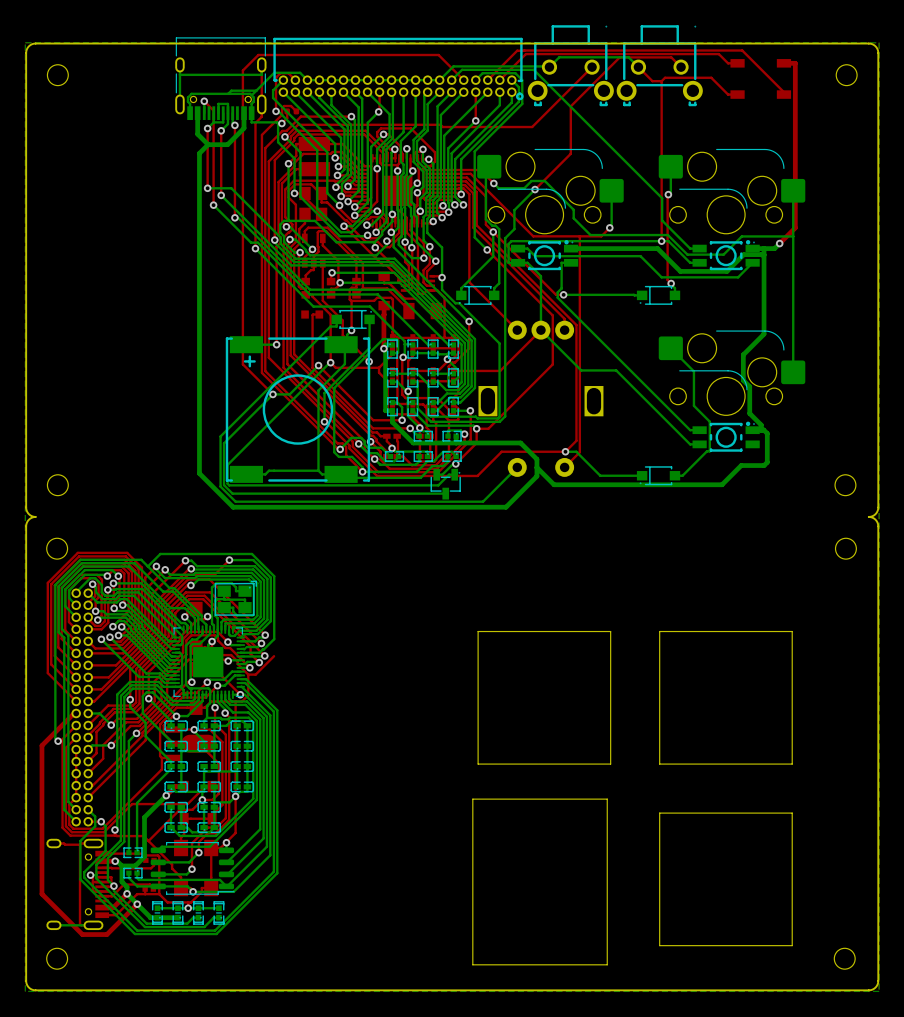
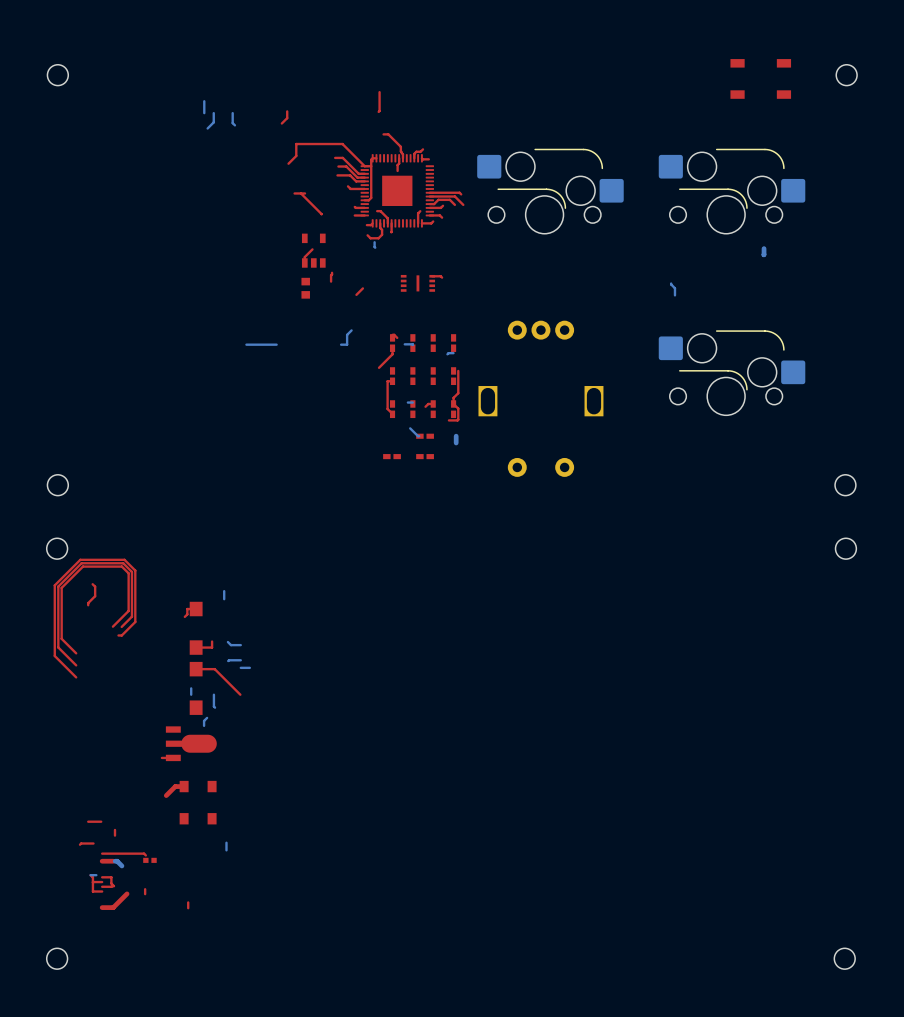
bottom zone outline: (879, 42) (879, 991) (25, 991) (25, 42) (879, 42) -> none
board edge: (868, 43) (35, 43) (28, 46) (26, 53) (26, 507) (28, 514) (35, 516) (28, 519) (26, 526) (26, 980) (28, 987) (35, 990) (868, 990) (876, 986) (878, 980) (878, 526) (875, 519) (868, 516) (875, 514) (878, 507) (878, 53) (875, 46) (868, 43) -> none
top track: (737, 63) (728, 63) (718, 54) (525, 54) (499, 80) -> none
top track: (783, 63) (795, 63) (795, 227) (779, 243) -> none
bottom track: (179, 64) (179, 104) -> none
top track: (261, 64) (261, 116) (255, 123) (255, 248) -> none
bottom track: (261, 64) (261, 74) (179, 74) -> none
part: (570, 65) -> none
part: (659, 65) -> none
top track: (592, 67) (532, 127) (298, 124) (284, 136) -> none
top track: (638, 67) (652, 81) (661, 81) -> none
bottom track: (638, 67) (628, 57) (559, 57) (549, 67) (453, 66) (439, 80) (307, 80) (300, 72) (274, 72) (252, 94) -> none
top track: (681, 67) (671, 57) (619, 57) (570, 106) (570, 153) (535, 189) -> none
part: (398, 69) -> none
part: (220, 78) -> none
bottom track: (283, 80) (273, 90) (273, 98) (327, 152) (327, 193) (339, 205) -> none
top track: (295, 80) (288, 73) (280, 73) (276, 77) (276, 111) -> none
bottom track: (451, 80) (462, 69) (533, 69) (662, 198) (662, 220) (690, 248) (699, 248) -> none
top track: (463, 80) (438, 55) (258, 55) (242, 70) (242, 364) (272, 394) -> none
bottom track: (475, 80) (482, 73) (515, 73) (522, 80) (522, 103) (474, 151) (474, 237) (487, 249) -> none
top track: (487, 80) (517, 50) (742, 50) (783, 92) (783, 94) -> none
bottom track: (511, 80) (518, 87) (518, 101) (461, 159) (461, 194) -> none
top track: (661, 81) (661, 241) -> none
top track: (661, 81) (665, 77) (711, 77) (728, 94) (737, 94) -> none
bottom track: (256, 90) (231, 90) (228, 93) -> none
bottom track: (283, 92) (335, 143) (335, 157) -> none
bottom track: (295, 92) (341, 137) (341, 163) (338, 166) -> none
bottom track: (307, 92) (344, 129) (344, 169) (337, 175) -> none
bottom track: (319, 92) (319, 97) (347, 126) (347, 173) (335, 187) -> none
bottom track: (331, 92) (331, 105) (351, 124) (351, 174) (341, 184) (341, 196) -> none
bottom track: (343, 92) (358, 107) (358, 191) (348, 201) -> none
bottom track: (355, 92) (362, 98) (362, 199) (354, 206) -> none
bottom track: (367, 92) (389, 114) (389, 136) (377, 149) (377, 168) -> none
bottom track: (391, 92) (392, 138) (383, 147) (383, 213) (371, 225) (366, 225) -> none
bottom track: (403, 92) (403, 132) (386, 149) (386, 222) (376, 232) -> none
bottom track: (415, 92) (415, 126) (400, 141) (400, 161) (403, 164) (403, 173) (401, 175) (401, 236) (398, 239) (398, 244) (412, 258) (423, 258) -> none
bottom track: (427, 92) (424, 95) (424, 129) (413, 139) (413, 161) (423, 171) (423, 186) (417, 192) -> none
bottom track: (439, 92) (427, 104) (427, 130) (416, 141) (416, 160) (426, 170) (426, 192) (420, 198) (420, 211) -> none
bottom track: (451, 92) (437, 106) (437, 195) (433, 200) (433, 221) -> none
bottom track: (463, 92) (440, 115) (440, 197) (437, 201) (437, 212) (442, 217) -> none
top track: (475, 92) (475, 120) -> none
bottom track: (487, 92) (444, 135) (443, 205) -> none
bottom track: (499, 92) (499, 105) (451, 153) (451, 201) (454, 204) -> none
bottom track: (511, 92) (511, 102) (455, 159) (455, 196) (463, 204) -> none
top track: (204, 101) (213, 110) (213, 205) -> none
via: (204, 101) -> none
bottom track: (276, 111) (278, 111) (317, 150) (317, 208) (341, 232) (351, 232) (372, 211) (377, 211) -> none
via: (276, 111) -> none
part: (291, 111) -> none
top track: (296, 111) (291, 106) (284, 106) (282, 108) (282, 114) (261, 134) (261, 372) (340, 449) -> none
bottom track: (378, 111) (367, 122) (367, 202) (354, 215) -> none
via: (378, 111) -> none
bottom track: (190, 113) (187, 97) (191, 93) (250, 93) (253, 97) (251, 103) (251, 122) (278, 123) -> none
bottom track: (197, 113) (197, 134) (208, 144) -> none
bottom track: (218, 113) (218, 103) (227, 103) (227, 124) (221, 130) -> none
bottom track: (223, 113) (223, 122) (213, 122) -> none
bottom track: (244, 113) (244, 128) (227, 144) (208, 144) -> none
top track: (351, 116) (300, 116) (265, 148) (265, 371) (337, 443) (342, 443) (346, 446) (346, 455) (362, 471) -> none
bottom track: (351, 116) (354, 119) (354, 179) (348, 186) -> none
via: (351, 116) -> none
bottom track: (475, 120) (448, 148) (448, 212) -> none
via: (475, 120) -> none
bottom track: (278, 123) (278, 142) (294, 158) (294, 193) -> none
via: (281, 123) -> none
top track: (234, 125) (234, 217) -> none
via: (234, 125) -> none
top track: (207, 128) (207, 188) -> none
via: (207, 128) -> none
top track: (221, 130) (221, 195) -> none
via: (221, 130) -> none
bottom track: (383, 134) (371, 146) (371, 207) (352, 226) (343, 226) -> none
via: (383, 134) -> none
bottom track: (284, 136) (300, 152) (300, 196) (339, 236) (367, 235) -> none
via: (284, 136) -> none
bottom track: (208, 144) (199, 153) (199, 473) (233, 507) (506, 507) (536, 476) (536, 459) (520, 442) (413, 442) (392, 422) (392, 410) (385, 410) (385, 344) (392, 344) -> none
bottom track: (406, 148) (406, 174) (404, 177) (405, 242) -> none
via: (406, 148) -> none
bottom track: (394, 149) (391, 152) (392, 221) (382, 231) (382, 234) (374, 242) (336, 242) (315, 220) (283, 220) (280, 224) (280, 232) (284, 236) (284, 242) (294, 252) (300, 252) -> none
via: (394, 149) -> none
bottom track: (422, 149) (422, 161) (429, 168) (429, 194) (426, 197) (423, 240) (429, 246) -> none
via: (422, 149) -> none
part: (314, 156) -> none
via: (335, 157) -> none
top track: (380, 158) (382, 165) (397, 165) -> none
top track: (384, 158) (384, 154) (364, 134) (298, 134) (274, 160) (274, 240) -> none
top track: (387, 158) (387, 152) (365, 130) (296, 130) (268, 161) (268, 357) (352, 441) (352, 446) (378, 472) (438, 472) (470, 439) (470, 410) -> none
top track: (391, 158) (395, 158) (395, 149) (390, 149) (377, 136) (377, 132) (381, 128) (411, 128) (435, 152) (435, 161) (430, 166) (423, 168) (423, 198) (429, 200) -> none
top track: (410, 158) (410, 168) (412, 170) -> none
top track: (418, 158) (417, 183) -> none
bottom track: (428, 159) (433, 163) (433, 195) (429, 199) (427, 232) (442, 247) (442, 289) (455, 303) (459, 303) (499, 343) (499, 417) (430, 416) (428, 414) (428, 384) (417, 373) (392, 373) -> none
via: (428, 159) -> none
bottom track: (288, 163) (288, 220) -> none
via: (288, 163) -> none
via: (338, 166) -> none
bottom track: (489, 166) (485, 170) (485, 219) (499, 229) (499, 283) (494, 288) (494, 295) -> none
bottom track: (670, 166) (670, 192) (668, 194) -> none
top track: (377, 168) (377, 201) (369, 211) (364, 211) -> none
via: (377, 168) -> none
top track: (314, 169) (296, 169) (281, 183) (281, 222) (286, 226) -> none
top track: (364, 170) (359, 170) (341, 151) (303, 153) (278, 182) (278, 235) (280, 242) (276, 246) (276, 344) -> none
bottom track: (397, 170) (398, 227) (393, 232) -> none
via: (397, 170) -> none
bottom track: (412, 170) (407, 178) (407, 204) (411, 207) (411, 216) (411, 247) -> none
via: (412, 170) -> none
top track: (429, 170) (480, 170) (493, 183) -> none
top track: (429, 173) (470, 173) (533, 236) (601, 236) (609, 227) -> none
via: (337, 175) -> none
top track: (429, 177) (466, 177) (485, 196) (485, 224) (556, 294) (563, 294) -> none
top track: (429, 181) (466, 181) (476, 192) (476, 225) (576, 325) (576, 440) (565, 451) (501, 451) (477, 475) (377, 475) (324, 421) -> none
bottom track: (417, 183) (411, 189) (411, 201) (414, 204) (414, 214) (416, 217) (416, 242) (435, 261) -> none
via: (417, 183) -> none
bottom track: (493, 183) (498, 188) (524, 188) (531, 180) (544, 180) (573, 209) (573, 218) (590, 235) (667, 235) (687, 254) (723, 254) (741, 236) (793, 236) -> none
via: (493, 183) -> none
top track: (364, 185) (355, 185) (350, 180) (293, 180) (285, 189) (285, 217) (292, 224) (292, 229) (284, 236) (283, 244) (283, 367) (358, 443) -> none
top track: (429, 185) (465, 185) (473, 193) (473, 227) (564, 318) (564, 330) -> none
via: (348, 186) -> none
top track: (335, 187) (340, 187) (345, 192) (364, 192) -> none
via: (335, 187) -> none
bottom track: (207, 188) (231, 188) (280, 237) (280, 243) (295, 258) (394, 258) (474, 339) (474, 387) (460, 402) (453, 402) -> none
via: (207, 188) -> none
top track: (429, 188) (463, 188) (469, 194) (469, 282) (517, 330) -> none
bottom track: (535, 189) (514, 210) (514, 229) (505, 238) (505, 416) (499, 421) (431, 421) (417, 408) (417, 381) (412, 381) -> none
via: (535, 189) -> none
top track: (397, 190) (397, 208) (406, 217) (406, 232) (417, 243) (417, 293) (423, 293) (427, 290) (437, 290) (444, 297) (444, 337) -> none
bottom track: (611, 190) (611, 226) (609, 227) -> none
bottom track: (793, 190) (793, 372) -> none
top track: (417, 192) (414, 223) -> none
via: (417, 192) -> none
via: (294, 193) -> none
top track: (321, 193) (321, 202) (327, 202) (365, 241) (377, 241) (383, 247) (389, 247) (402, 233) (402, 223) -> none
top track: (321, 194) (311, 184) (295, 184) (288, 190) (288, 197) (295, 204) (295, 242) (290, 247) (290, 355) (376, 439) (386, 451) (386, 456) -> none
via: (461, 194) -> none
top track: (668, 194) (667, 279) (671, 283) -> none
via: (668, 194) -> none
bottom track: (221, 195) (291, 265) (391, 265) (468, 341) (468, 385) (459, 393) (447, 393) (438, 402) (433, 402) -> none
via: (221, 195) -> none
top track: (341, 196) (364, 196) -> none
via: (341, 196) -> none
top track: (348, 201) (357, 201) (360, 204) (364, 204) -> none
via: (348, 201) -> none
part: (313, 203) -> none
via: (454, 204) -> none
via: (463, 204) -> none
bottom track: (213, 205) (251, 242) (257, 242) (309, 294) (377, 294) (428, 344) (433, 344) -> none
via: (213, 205) -> none
top track: (339, 205) (339, 208) (352, 221) (362, 221) (371, 217) (381, 217) (384, 223) -> none
via: (339, 205) -> none
via: (443, 205) -> none
via: (354, 206) -> none
via: (377, 211) -> none
via: (420, 211) -> none
top track: (429, 211) (448, 212) -> none
via: (448, 212) -> none
top track: (305, 214) (305, 223) (299, 229) (299, 243) (294, 249) (294, 354) (372, 432) (377, 432) (380, 436) (386, 436) (386, 441) (392, 448) -> none
top track: (392, 214) (395, 217) (395, 223) -> none
via: (392, 214) -> none
via: (354, 215) -> none
bottom track: (234, 217) (238, 217) (309, 289) (393, 289) (448, 344) (453, 344) -> none
via: (234, 217) -> none
via: (442, 217) -> none
via: (433, 221) -> none
top track: (376, 223) (376, 232) -> none
top track: (399, 223) (399, 232) (390, 241) (386, 241) -> none
top track: (410, 223) (410, 229) (423, 243) (423, 258) -> none
via: (366, 225) -> none
bottom track: (286, 226) (289, 226) (312, 249) -> none
via: (286, 226) -> none
top track: (343, 226) (383, 265) (386, 265) (398, 277) (398, 281) (403, 281) -> none
via: (343, 226) -> none
via: (609, 227) -> none
via: (376, 232) -> none
via: (391, 232) -> none
bottom track: (393, 232) (393, 247) (469, 321) -> none
bottom track: (493, 232) (493, 256) (461, 288) (461, 295) -> none
via: (493, 232) -> none
via: (367, 235) -> none
top track: (579, 236) (579, 452) (564, 467) -> none
top track: (304, 238) (304, 231) (308, 227) (327, 227) (362, 262) (362, 288) (387, 288) (408, 311) -> none
top track: (322, 238) (322, 245) (338, 261) (338, 285) (335, 288) (331, 288) (331, 294) -> none
top track: (289, 239) (287, 245) (287, 364) (364, 441) (364, 449) (374, 459) -> none
bottom track: (289, 239) (295, 239) (310, 255) (376, 255) (386, 244) (386, 241) -> none
via: (289, 239) -> none
bottom track: (274, 240) (274, 242) (294, 262) (393, 262) (471, 340) (471, 386) (460, 397) (450, 397) (438, 410) (433, 410) -> none
via: (274, 240) -> none
via: (386, 241) -> none
via: (661, 241) -> none
top track: (405, 242) (405, 261) (408, 265) (408, 285) (403, 285) -> none
via: (405, 242) -> none
bottom track: (779, 243) (774, 248) (752, 248) -> none
via: (779, 243) -> none
top track: (429, 246) (429, 263) (423, 270) (423, 282) (426, 285) (432, 285) -> none
via: (429, 246) -> none
top track: (375, 247) (403, 276) -> none
via: (375, 247) -> none
top track: (411, 247) (412, 287) (408, 290) (403, 290) -> none
via: (411, 247) -> none
bottom track: (255, 248) (313, 306) (370, 306) (404, 341) (403, 357) -> none
via: (255, 248) -> none
bottom track: (518, 248) (527, 248) (535, 256) (640, 256) (661, 277) (738, 277) (752, 262) -> none
bottom track: (571, 248) (657, 248) (680, 271) (727, 271) (743, 254) (763, 254) (764, 334) (743, 354) (743, 380) (749, 386) (749, 413) (761, 425) (761, 430) -> none
via: (312, 249) -> none
top track: (487, 249) (552, 315) (552, 364) (488, 428) (476, 428) (476, 443) (455, 463) -> none
via: (487, 249) -> none
top track: (300, 252) (298, 286) (305, 288) (305, 294) (312, 294) (330, 314) (330, 362) (335, 367) (379, 367) (379, 372) (387, 381) -> none
via: (300, 252) -> none
part: (544, 255) -> none
part: (726, 255) -> none
via: (423, 258) -> none
top track: (435, 261) (427, 271) (427, 281) (432, 281) -> none
via: (435, 261) -> none
top track: (322, 262) (322, 300) (342, 320) (342, 335) (369, 361) -> none
bottom track: (571, 262) (561, 262) (561, 288) (557, 292) (557, 297) (690, 430) (699, 430) -> none
bottom track: (699, 262) (690, 262) (668, 241) (511, 241) (508, 244) (508, 262) (527, 262) (540, 276) (540, 330) (581, 370) (616, 370) (690, 444) (699, 444) -> none
bottom track: (332, 272) (394, 272) (464, 343) (464, 383) (458, 390) (446, 390) (438, 381) (433, 381) -> none
via: (332, 272) -> none
top track: (384, 276) (384, 283) (389, 283) (404, 298) (415, 298) (428, 311) (436, 311) -> none
via: (442, 277) -> none
top track: (305, 281) (305, 275) (313, 270) (313, 255) (318, 251) (317, 232) (326, 231) (356, 261) (356, 287) (349, 289) (349, 299) (374, 300) (377, 297) (391, 297) (392, 299) (392, 337) -> none
bottom track: (340, 282) (399, 282) (461, 344) (461, 382) (457, 386) (449, 386) (448, 373) -> none
via: (340, 282) -> none
via: (671, 283) -> none
part: (331, 288) -> none
part: (356, 288) -> none
part: (384, 290) -> none
bottom track: (563, 294) (642, 295) -> none
via: (563, 294) -> none
part: (477, 295) -> none
part: (658, 295) -> none
top track: (351, 300) (351, 330) -> none
top track: (384, 305) (383, 348) -> none
part: (422, 311) -> none
part: (312, 314) -> none
top track: (319, 314) (312, 315) (312, 367) (373, 428) (410, 428) -> none
bottom track: (336, 319) (336, 326) (330, 326) (220, 436) (220, 486) (235, 501) (483, 501) (517, 467) -> none
part: (353, 319) -> none
bottom track: (369, 319) (369, 348) (324, 393) (324, 421) -> none
top track: (469, 321) (469, 348) (448, 366) (448, 381) -> none
via: (469, 321) -> none
via: (351, 330) -> none
top track: (540, 330) (500, 370) (453, 370) -> none
via: (276, 344) -> none
bottom track: (344, 344) (344, 364) (318, 390) (318, 470) -> none
via: (383, 348) -> none
top track: (453, 348) (412, 348) (412, 356) (408, 360) (408, 391) -> none
bottom track: (670, 348) (693, 371) (693, 405) (709, 421) (709, 451) (706, 451) (682, 475) (674, 475) -> none
part: (392, 349) -> none
part: (412, 349) -> none
part: (433, 349) -> none
part: (453, 349) -> none
bottom track: (392, 353) (398, 352) (398, 340) (383, 339) (334, 388) (334, 452) (338, 456) (352, 456) (362, 467) (362, 471) (416, 471) (427, 461) (433, 461) (443, 451) (452, 451) (456, 456) -> none
bottom track: (412, 353) (447, 354) (447, 359) (458, 370) (458, 377) (453, 381) -> none
top track: (403, 357) (402, 394) (405, 398) (437, 398) (448, 409) (448, 414) (453, 414) -> none
via: (403, 357) -> none
via: (447, 359) -> none
via: (369, 361) -> none
bottom track: (330, 362) (227, 464) (229, 485) (438, 485) (449, 474) (454, 474) -> none
via: (330, 362) -> none
top track: (318, 365) (373, 420) (402, 420) -> none
bottom track: (318, 365) (289, 394) (272, 394) (224, 443) (224, 485) (232, 493) (445, 493) -> none
via: (318, 365) -> none
top track: (392, 370) (397, 370) (397, 403) -> none
top track: (412, 370) (438, 370) (458, 353) (458, 337) (397, 337) (397, 370) -> none
bottom track: (453, 373) (433, 373) -> none
part: (392, 377) -> none
part: (412, 377) -> none
part: (433, 377) -> none
part: (453, 377) -> none
bottom track: (392, 381) (397, 381) (407, 392) (407, 415) (423, 431) (427, 431) (427, 436) -> none
top track: (453, 381) (412, 381) -> none
via: (408, 391) -> none
via: (272, 394) -> none
bottom track: (392, 402) (397, 402) (402, 407) (402, 420) -> none
top track: (392, 403) (423, 404) (426, 407) (426, 427) (430, 431) (430, 456) -> none
top track: (432, 403) (448, 420) (448, 452) (435, 465) (411, 465) (403, 456) (397, 456) (397, 436) -> none
part: (392, 406) -> none
part: (412, 406) -> none
part: (433, 406) -> none
part: (453, 406) -> none
part: (297, 409) -> none
bottom track: (412, 410) (427, 425) (473, 425) (476, 428) -> none
bottom track: (470, 410) (453, 410) -> none
via: (470, 410) -> none
top track: (412, 414) (392, 414) -> none
top track: (433, 414) (433, 420) (436, 423) (434, 461) (419, 461) (419, 424) (409, 414) -> none
via: (402, 420) -> none
via: (324, 421) -> none
via: (419, 427) -> none
via: (410, 428) -> none
via: (476, 428) -> none
bottom track: (752, 430) (763, 429) (767, 433) (767, 462) (764, 465) (741, 465) (722, 484) (554, 484) (536, 467) -> none
top track: (464, 434) (464, 441) (437, 468) (389, 468) (380, 459) (380, 451) (370, 441) -> none
bottom track: (464, 434) (460, 430) (448, 430) (447, 436) -> none
via: (464, 434) -> none
part: (392, 436) -> none
part: (423, 436) -> none
part: (452, 436) -> none
part: (726, 436) -> none
via: (370, 441) -> none
bottom track: (358, 443) (368, 453) (377, 453) (385, 461) (394, 461) (398, 456) -> none
via: (358, 443) -> none
bottom track: (392, 448) (395, 451) (427, 451) (427, 456) -> none
via: (392, 448) -> none
bottom track: (340, 449) (351, 437) (361, 437) (367, 447) (381, 447) (390, 456) -> none
via: (340, 449) -> none
bottom track: (565, 451) (576, 451) (600, 475) (642, 475) -> none
via: (565, 451) -> none
part: (394, 456) -> none
bottom track: (419, 456) (419, 461) (415, 464) (380, 464) (374, 459) -> none
part: (423, 456) -> none
bottom track: (447, 456) (447, 461) (443, 466) (432, 466) (420, 477) (344, 477) (341, 474) (322, 474) (318, 470) -> none
part: (452, 456) -> none
via: (374, 459) -> none
bottom track: (455, 463) (453, 463) (442, 474) (436, 474) -> none
via: (455, 463) -> none
bottom track: (318, 470) (269, 470) (265, 474) (246, 474) -> none
via: (362, 471) -> none
part: (658, 475) -> none
part: (445, 484) -> none
top track: (185, 560) (151, 594) (151, 629) (116, 665) (88, 665) -> none
bottom track: (185, 560) (191, 560) (197, 566) (254, 566) (267, 578) (267, 619) (256, 630) (239, 630) (234, 635) (230, 635) (229, 629) -> none
via: (185, 560) -> none
top track: (229, 560) (214, 574) (187, 574) (158, 604) (158, 632) (101, 689) (88, 689) -> none
bottom track: (229, 560) (253, 560) (270, 577) (270, 621) (257, 634) (244, 634) (240, 637) -> none
via: (229, 560) -> none
bottom track: (147, 566) (160, 553) (251, 553) (274, 576) (274, 639) (259, 652) (240, 652) -> none
top track: (156, 566) (145, 577) (145, 626) (123, 648) (95, 648) (88, 641) -> none
bottom track: (156, 566) (156, 569) (164, 578) (250, 576) (257, 583) (257, 615) (253, 619) (224, 619) (221, 622) (221, 629) -> none
via: (156, 566) -> none
top track: (191, 568) (155, 602) (155, 630) (108, 677) (88, 677) -> none
bottom track: (191, 568) (253, 569) (264, 580) (264, 618) (255, 627) (235, 627) (232, 629) -> none
via: (191, 568) -> none
top track: (165, 569) (148, 586) (148, 628) (123, 653) (88, 653) -> none
bottom track: (165, 569) (170, 574) (251, 572) (260, 581) (260, 617) (254, 623) (225, 623) (225, 629) -> none
via: (165, 569) -> none
top track: (107, 576) (113, 570) (120, 570) (124, 573) (124, 603) (122, 605) -> none
bottom track: (107, 576) (84, 574) (69, 590) (69, 598) (76, 605) -> none
via: (107, 576) -> none
top track: (118, 576) (119, 596) (114, 601) (114, 608) -> none
bottom track: (118, 576) (112, 570) (84, 570) (65, 589) (65, 606) (76, 617) -> none
via: (118, 576) -> none
top track: (113, 583) (113, 597) (108, 602) (108, 622) (101, 629) (88, 629) -> none
bottom track: (113, 583) (141, 583) (181, 623) (187, 625) (187, 629) -> none
via: (113, 583) -> none
bottom track: (92, 584) (96, 587) (96, 592) (102, 599) (115, 599) (118, 595) (133, 595) (175, 637) -> none
via: (92, 584) -> none
top track: (190, 585) (187, 585) (165, 607) (165, 635) (130, 670) (130, 699) -> none
bottom track: (190, 585) (198, 579) (249, 579) (253, 584) (252, 615) (237, 615) (233, 611) (233, 607) (224, 607) -> none
via: (190, 585) -> none
top track: (107, 589) (107, 597) (104, 600) (104, 621) (100, 625) (95, 625) (88, 617) -> none
bottom track: (107, 589) (142, 589) (183, 629) -> none
via: (107, 589) -> none
bottom track: (245, 591) (236, 591) (236, 587) (231, 583) (216, 583) (211, 587) (211, 623) (213, 629) -> none
bottom track: (76, 593) (90, 578) (95, 578) (101, 584) (101, 592) (105, 595) (114, 595) (117, 592) (138, 592) (182, 636) (182, 643) (175, 645) -> none
bottom track: (88, 593) (97, 602) (116, 602) (120, 599) (126, 599) (169, 641) (175, 641) -> none
part: (235, 598) -> none
bottom track: (122, 605) (127, 605) (171, 648) (175, 648) -> none
via: (122, 605) -> none
bottom track: (245, 607) (245, 599) (217, 599) (215, 600) (217, 635) (208, 644) (208, 662) -> none
bottom track: (114, 608) (116, 611) (128, 611) (171, 656) (175, 656) -> none
via: (114, 608) -> none
top track: (95, 611) (95, 600) (98, 597) (98, 581) (95, 578) (81, 578) (68, 590) (68, 622) (76, 629) -> none
bottom track: (95, 611) (103, 611) (106, 614) (127, 614) (170, 660) (175, 660) -> none
via: (95, 611) -> none
bottom track: (184, 616) (191, 623) (191, 629) -> none
via: (184, 616) -> none
top track: (207, 616) (205, 619) (198, 619) (179, 637) (179, 641) (148, 671) (148, 698) -> none
via: (207, 616) -> none
top track: (97, 620) (101, 616) (101, 579) (97, 574) (79, 574) (65, 589) (65, 630) (76, 641) -> none
bottom track: (97, 620) (100, 617) (125, 617) (169, 664) (175, 664) -> none
via: (97, 620) -> none
bottom track: (112, 626) (118, 621) (124, 621) (168, 667) (175, 667) -> none
via: (112, 626) -> none
bottom track: (121, 626) (167, 671) (175, 671) -> none
via: (121, 626) -> none
bottom track: (194, 629) (194, 618) (184, 608) (170, 608) (129, 566) (83, 566) (62, 587) (62, 629) (68, 635) (68, 801) (76, 809) -> none
bottom track: (198, 629) (198, 616) (173, 591) (163, 591) (134, 563) (81, 563) (58, 586) (58, 632) (64, 637) (64, 809) (76, 821) -> none
bottom track: (202, 629) (202, 633) (196, 639) (192, 639) (185, 645) (185, 684) (189, 688) (210, 690) (207, 717) (228, 719) (248, 717) (253, 722) (253, 798) (216, 835) (179, 835) (171, 827) -> none
bottom track: (206, 629) (206, 624) (201, 620) (201, 615) (174, 588) (169, 588) (141, 559) (80, 559) (55, 585) (55, 738) (58, 741) -> none
bottom track: (210, 629) (210, 633) (199, 644) (192, 644) (190, 646) (191, 682) -> none
drawing: [477, 630, 612, 765] -> none
drawing: [659, 630, 793, 765] -> none
bottom track: (118, 635) (126, 635) (166, 675) (175, 675) -> none
via: (118, 635) -> none
top track: (265, 635) (209, 579) (188, 579) (161, 605) (161, 633) (94, 701) (88, 701) -> none
bottom track: (265, 635) (255, 641) (240, 641) -> none
via: (265, 635) -> none
top track: (109, 637) (114, 641) (120, 641) (138, 623) (138, 569) (125, 556) (79, 556) (51, 584) (51, 664) (76, 689) -> none
bottom track: (109, 637) (146, 673) (160, 673) (165, 679) (175, 679) -> none
via: (109, 637) -> none
top track: (101, 639) (107, 645) (122, 645) (141, 625) (141, 567) (127, 552) (77, 552) (47, 582) (47, 673) (76, 701) -> none
bottom track: (101, 639) (138, 676) (158, 676) (164, 683) (175, 683) -> none
via: (101, 639) -> none
via: (212, 641) -> none
top track: (227, 642) (217, 631) (190, 631) (183, 639) (183, 652) (154, 681) (154, 701) (137, 718) (117, 718) (111, 725) -> none
via: (227, 642) -> none
top track: (261, 643) (210, 592) (185, 592) (168, 609) (168, 636) (136, 668) (136, 702) (133, 705) (108, 705) (88, 725) -> none
bottom track: (261, 643) (257, 647) (240, 648) -> none
via: (261, 643) -> none
top track: (212, 647) (219, 655) (231, 655) (248, 674) -> none
bottom track: (175, 652) (182, 654) (182, 685) (180, 686) -> none
top track: (264, 655) (204, 595) (187, 595) (171, 611) (171, 637) (139, 670) (139, 703) (134, 708) (113, 708) (88, 737) -> none
bottom track: (264, 655) (240, 656) -> none
via: (264, 655) -> none
top track: (274, 656) (255, 674) (248, 674) -> none
top track: (228, 661) (188, 659) (167, 681) (167, 698) (139, 725) (130, 725) (111, 745) -> none
via: (228, 661) -> none
part: (208, 662) -> none
top track: (259, 662) (250, 653) (250, 646) (203, 599) (189, 599) (175, 613) (175, 639) (142, 671) (142, 705) (135, 712) (114, 712) (103, 723) (96, 731) (96, 753) (88, 761) -> none
bottom track: (259, 662) (247, 661) (240, 664) -> none
via: (259, 662) -> none
top track: (249, 667) (230, 647) (225, 647) (215, 635) (191, 635) (186, 640) (186, 654) (161, 679) (161, 699) (138, 722) (126, 722) (103, 745) (103, 758) (88, 773) -> none
via: (249, 667) -> none
bottom track: (240, 671) (232, 671) (224, 679) (209, 679) (207, 682) -> none
top track: (248, 674) (248, 695) (241, 701) (211, 701) (204, 707) (176, 707) (160, 724) (161, 769) (102, 828) (73, 828) (69, 824) (69, 804) (76, 797) (76, 749) -> none
bottom track: (240, 675) (234, 675) (224, 685) (217, 685) -> none
bottom track: (240, 679) (246, 679) (277, 710) (277, 873) (216, 934) (134, 934) (80, 879) (80, 841) (95, 826) (95, 816) (88, 809) -> none
top track: (191, 682) (188, 682) (136, 733) -> none
via: (191, 682) -> none
top track: (207, 682) (196, 693) (182, 693) (92, 785) (88, 785) -> none
via: (207, 682) -> none
bottom track: (240, 683) (245, 683) (273, 711) (273, 871) (215, 930) (137, 930) (84, 877) (84, 872) (105, 850) (105, 826) (101, 821) -> none
top track: (217, 685) (205, 697) (182, 697) (145, 733) (145, 740) (88, 797) -> none
via: (217, 685) -> none
bottom track: (180, 686) (163, 686) (158, 681) (129, 681) (117, 694) (117, 827) (114, 829) -> none
bottom track: (180, 686) (183, 690) (183, 694) (187, 694) -> none
bottom track: (240, 686) (270, 715) (270, 855) (233, 891) (193, 891) (187, 886) (137, 886) (128, 878) (128, 873) -> none
bottom track: (194, 694) (192, 701) (172, 701) (157, 685) (131, 685) (120, 695) (120, 840) (96, 865) (96, 878) (144, 927) (204, 927) (213, 917) (218, 917) -> none
bottom track: (198, 694) (198, 699) (193, 704) (171, 704) (155, 688) (132, 688) (124, 697) (124, 841) (107, 858) (107, 880) (113, 886) (113, 890) (146, 923) (187, 923) (193, 917) (198, 917) -> none
bottom track: (206, 694) (202, 694) (202, 701) (187, 716) (176, 716) -> none
bottom track: (217, 694) (217, 701) (225, 709) (225, 713) -> none
bottom track: (221, 694) (221, 701) (232, 712) (248, 712) (256, 720) (256, 799) (210, 846) (161, 846) (158, 850) -> none
bottom track: (225, 694) (225, 699) (230, 704) (245, 704) (260, 719) (260, 829) (226, 862) -> none
bottom track: (229, 694) (229, 698) (231, 701) (246, 701) (263, 718) (263, 838) (226, 874) -> none
bottom track: (232, 694) (244, 694) (266, 716) (266, 846) (227, 886) (219, 879) (138, 879) (137, 873) -> none
via: (240, 694) -> none
bottom track: (148, 698) (171, 720) (171, 725) -> none
via: (148, 698) -> none
bottom track: (130, 699) (130, 707) (145, 722) (145, 736) (171, 761) (171, 769) (137, 802) (137, 852) -> none
via: (130, 699) -> none
top track: (235, 701) (235, 833) (226, 842) -> none
part: (82, 707) -> none
top track: (215, 707) (215, 723) (225, 734) (225, 818) (216, 827) (207, 827) (192, 843) (192, 869) -> none
via: (215, 707) -> none
top track: (76, 713) (41, 745) (41, 894) (82, 934) (106, 934) (137, 904) -> none
bottom track: (88, 713) (99, 713) (111, 725) -> none
top track: (225, 713) (229, 717) (229, 819) (215, 833) (207, 833) (198, 842) (198, 852) -> none
via: (225, 713) -> none
top track: (176, 716) (172, 716) (163, 725) (163, 733) (173, 743) (199, 743) (218, 763) (218, 793) (212, 799) (202, 799) (192, 809) (179, 809) (148, 841) -> none
bottom track: (176, 716) (152, 692) (146, 692) (142, 696) (142, 713) (171, 741) (171, 746) -> none
via: (176, 716) -> none
top track: (76, 725) (62, 739) (62, 827) (70, 835) (143, 836) (172, 864) (172, 868) (181, 877) (181, 888) (190, 888) (193, 891) -> none
via: (111, 725) -> none
part: (176, 725) -> none
bottom track: (181, 725) (181, 786) -> none
part: (209, 725) -> none
bottom track: (237, 725) (237, 786) -> none
part: (242, 725) -> none
top track: (173, 729) (210, 729) (222, 742) (222, 804) (208, 818) -> none
bottom track: (194, 729) (204, 741) (204, 746) -> none
via: (194, 729) -> none
bottom track: (136, 733) (128, 741) (128, 852) -> none
via: (136, 733) -> none
top track: (76, 737) (65, 747) (65, 826) (71, 832) (103, 832) (132, 804) (187, 804) (205, 786) (212, 786) -> none
via: (58, 741) -> none
bottom track: (111, 745) (92, 745) (88, 749) -> none
via: (111, 745) -> none
part: (176, 746) -> none
part: (209, 746) -> none
part: (242, 746) -> none
bottom track: (214, 751) (181, 751) -> none
part: (176, 766) -> none
bottom track: (204, 766) (204, 791) (175, 791) (171, 786) -> none
part: (209, 766) -> none
bottom track: (214, 766) (214, 725) (226, 725) (231, 721) (242, 721) (247, 725) (247, 791) (240, 791) (229, 802) (214, 802) -> none
part: (242, 766) -> none
bottom track: (237, 771) (204, 771) -> none
part: (176, 786) -> none
part: (209, 786) -> none
bottom track: (214, 786) (214, 827) (209, 832) (192, 832) (187, 827) (181, 827) (181, 807) -> none
part: (242, 786) -> none
bottom track: (202, 791) (204, 827) -> none
bottom track: (166, 795) (144, 817) (144, 856) (135, 865) (121, 865) (121, 881) (127, 886) (127, 893) (137, 904) -> none
via: (166, 795) -> none
via: (235, 796) -> none
drawing: [472, 798, 608, 966] -> none
via: (202, 799) -> none
bottom track: (171, 807) (171, 827) -> none
part: (176, 807) -> none
part: (209, 807) -> none
drawing: [659, 812, 793, 947] -> none
top track: (212, 818) (184, 818) (184, 834) (181, 837) (181, 848) -> none
via: (101, 821) -> none
part: (176, 827) -> none
part: (209, 827) -> none
via: (114, 829) -> none
top track: (226, 842) (220, 848) (211, 848) (211, 888) (201, 888) (201, 891) (191, 902) (167, 902) (159, 894) -> none
via: (226, 842) -> none
top track: (53, 843) (80, 844) (80, 924) (93, 925) -> none
part: (196, 848) -> none
part: (132, 852) -> none
bottom track: (198, 852) (189, 862) (158, 862) -> none
via: (198, 852) -> none
top track: (145, 860) (145, 855) (159, 856) (159, 894) -> none
top track: (154, 860) (154, 865) (151, 868) (102, 867) -> none
via: (115, 861) -> none
part: (192, 868) -> none
bottom track: (192, 869) (186, 874) (158, 874) -> none
via: (192, 869) -> none
part: (132, 873) -> none
via: (90, 875) -> none
part: (77, 884) -> none
via: (113, 886) -> none
part: (196, 888) -> none
part: (149, 889) -> none
top track: (153, 889) (149, 884) (123, 884) (112, 896) (102, 896) -> none
via: (193, 891) -> none
via: (127, 893) -> none
top track: (159, 894) (137, 894) (116, 915) (102, 915) -> none
bottom track: (137, 904) (150, 917) (177, 917) -> none
via: (137, 904) -> none
via: (188, 908) -> none
bottom track: (218, 908) (157, 908) -> none
part: (157, 912) -> none
part: (177, 912) -> none
part: (198, 912) -> none
part: (218, 912) -> none
bottom track: (93, 925) (53, 925) -> none

